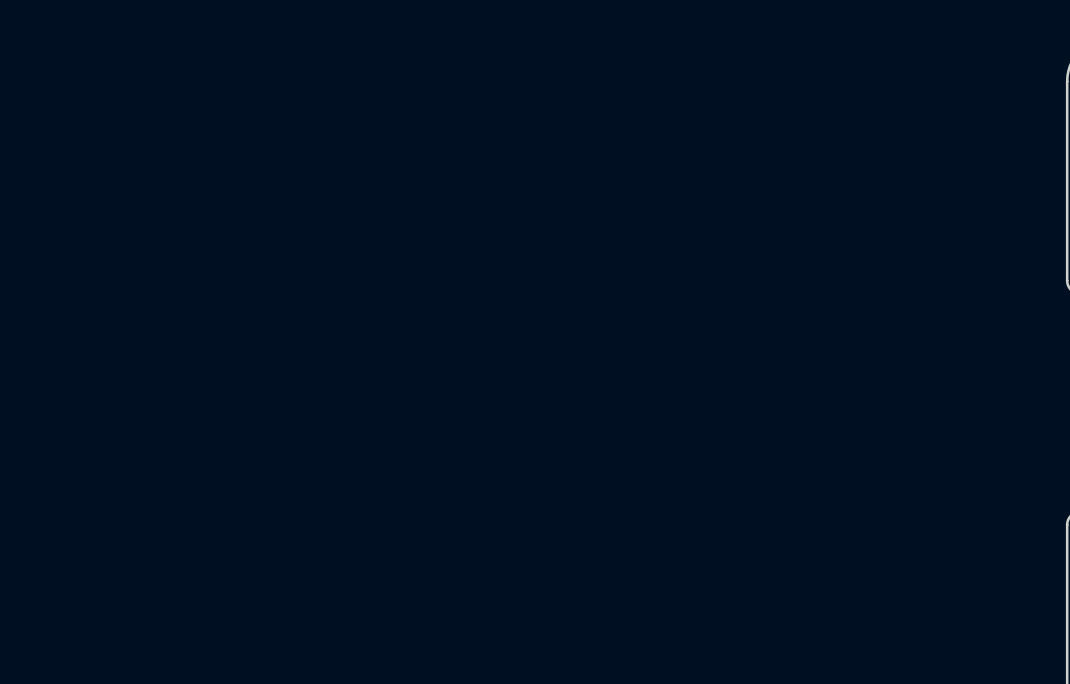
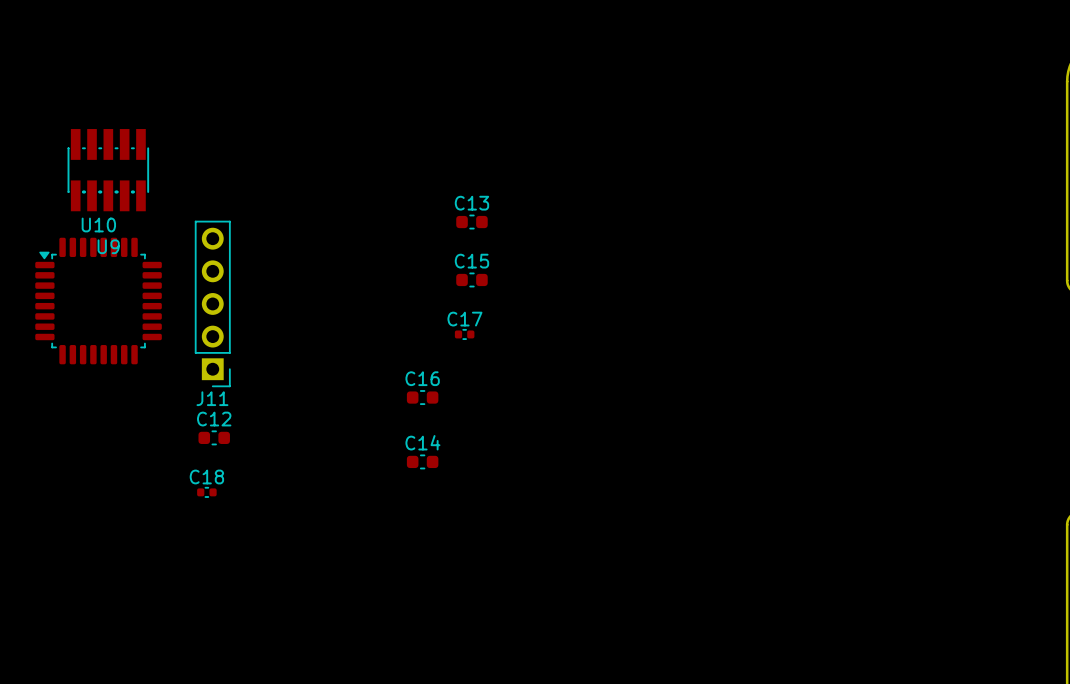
U9: none -> (108, 170)
C13: none -> (471, 222)
C15: none -> (471, 279)
U10: none -> (98, 301)
J11: none -> (212, 303)
C17: none -> (464, 334)
C16: none -> (422, 397)
C12: none -> (214, 437)
C14: none -> (422, 461)
C18: none -> (206, 492)

